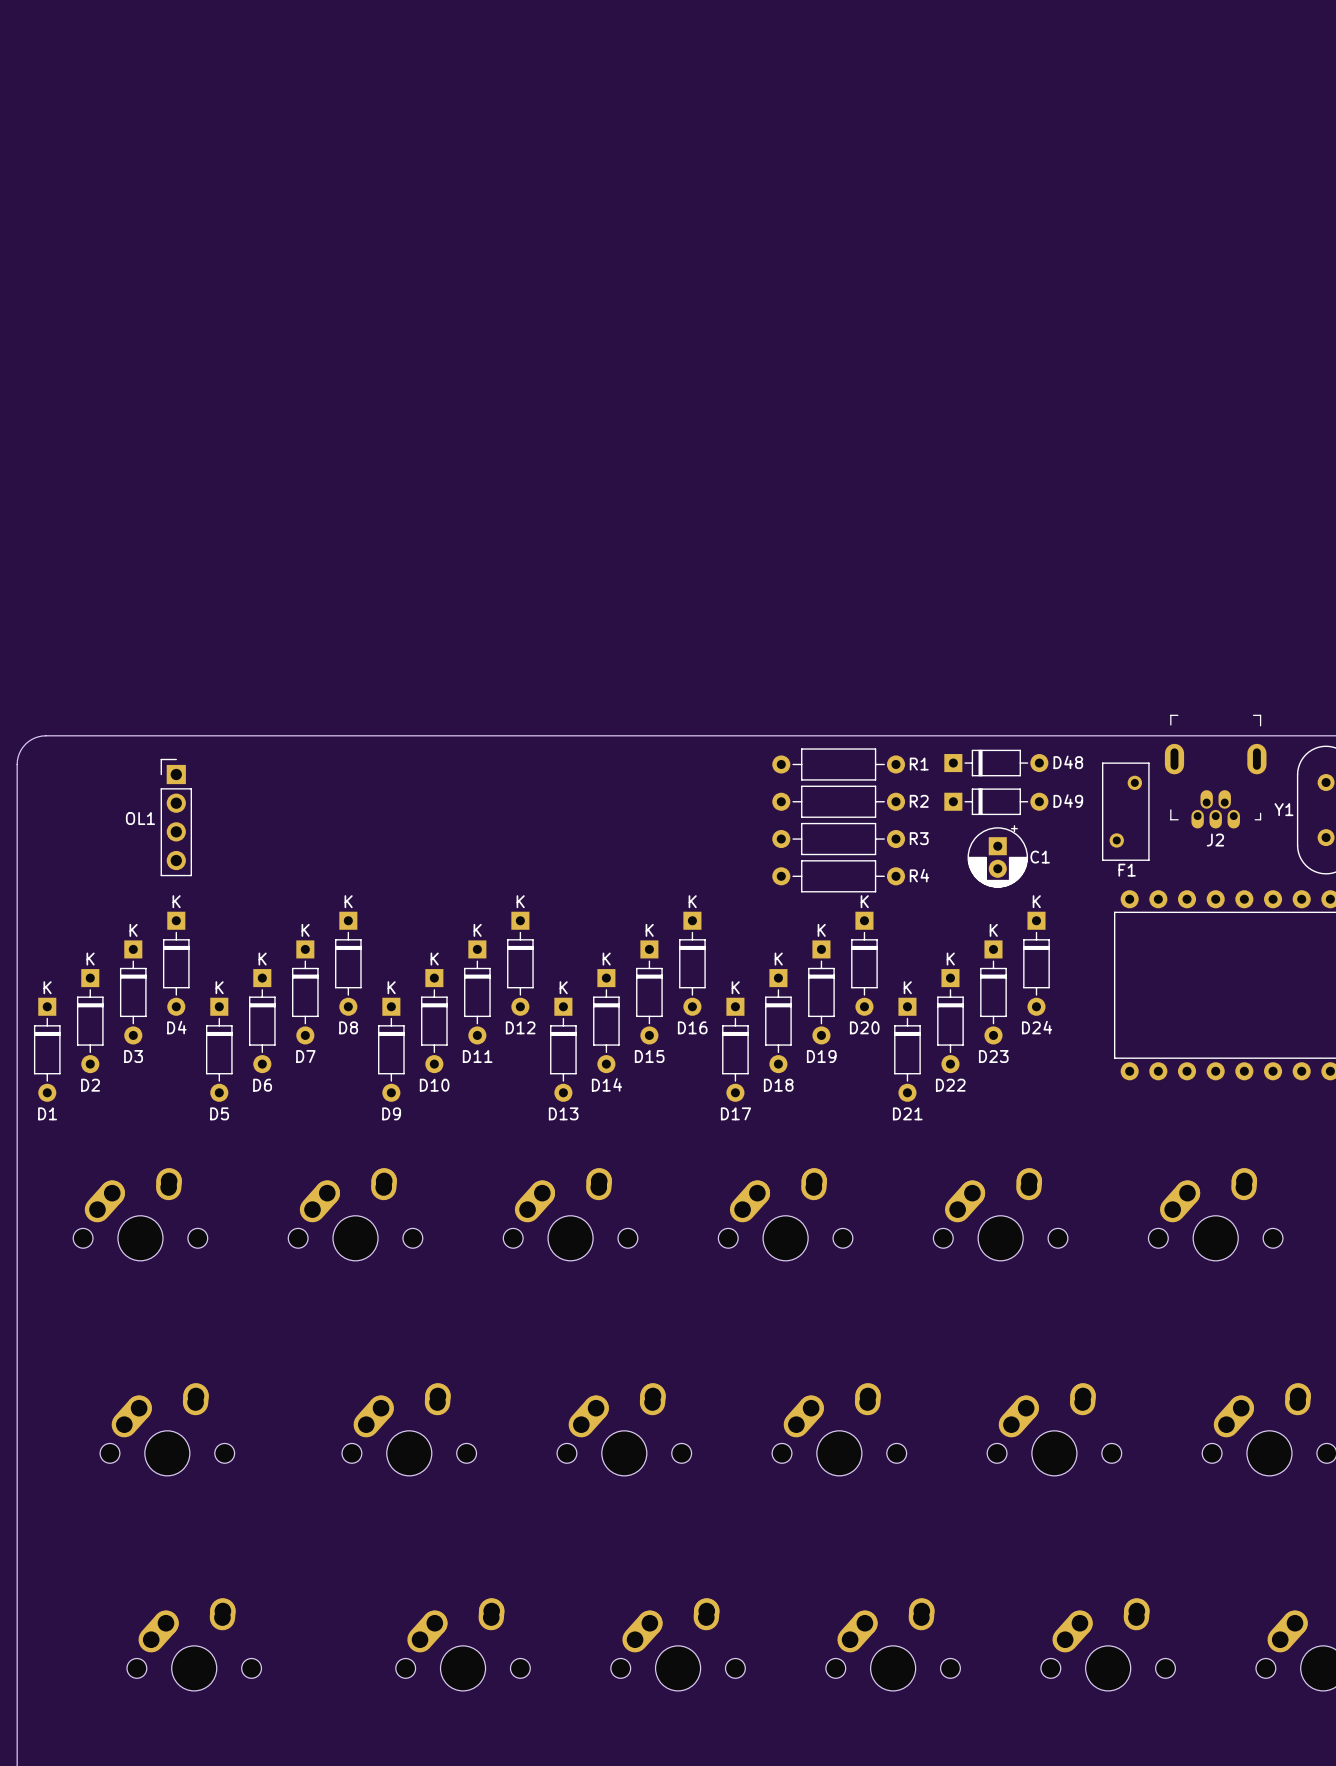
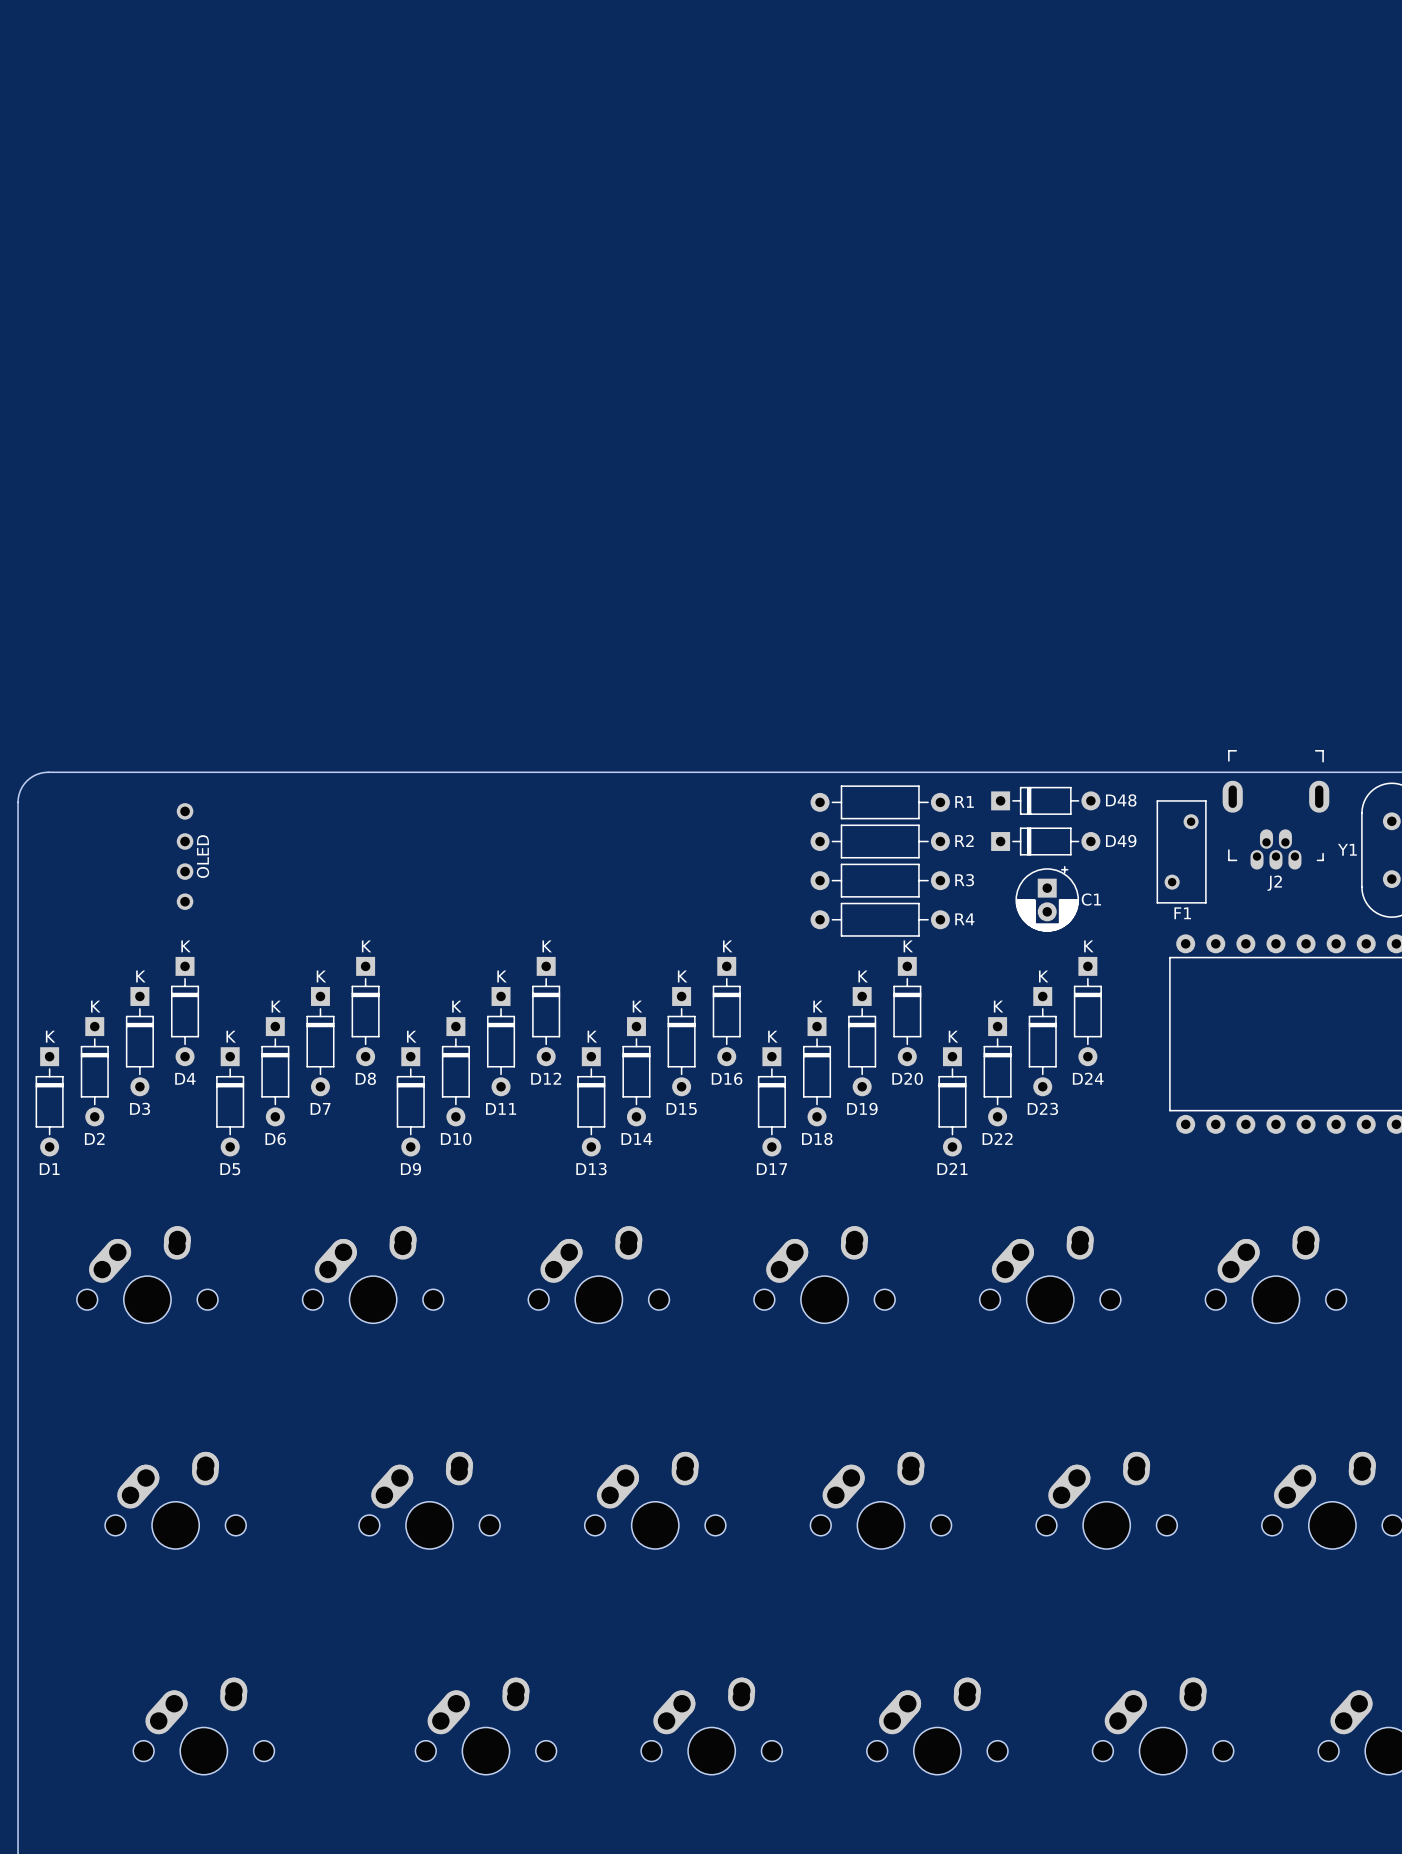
part: none -> (185, 856)
OL1: (176, 817) -> none

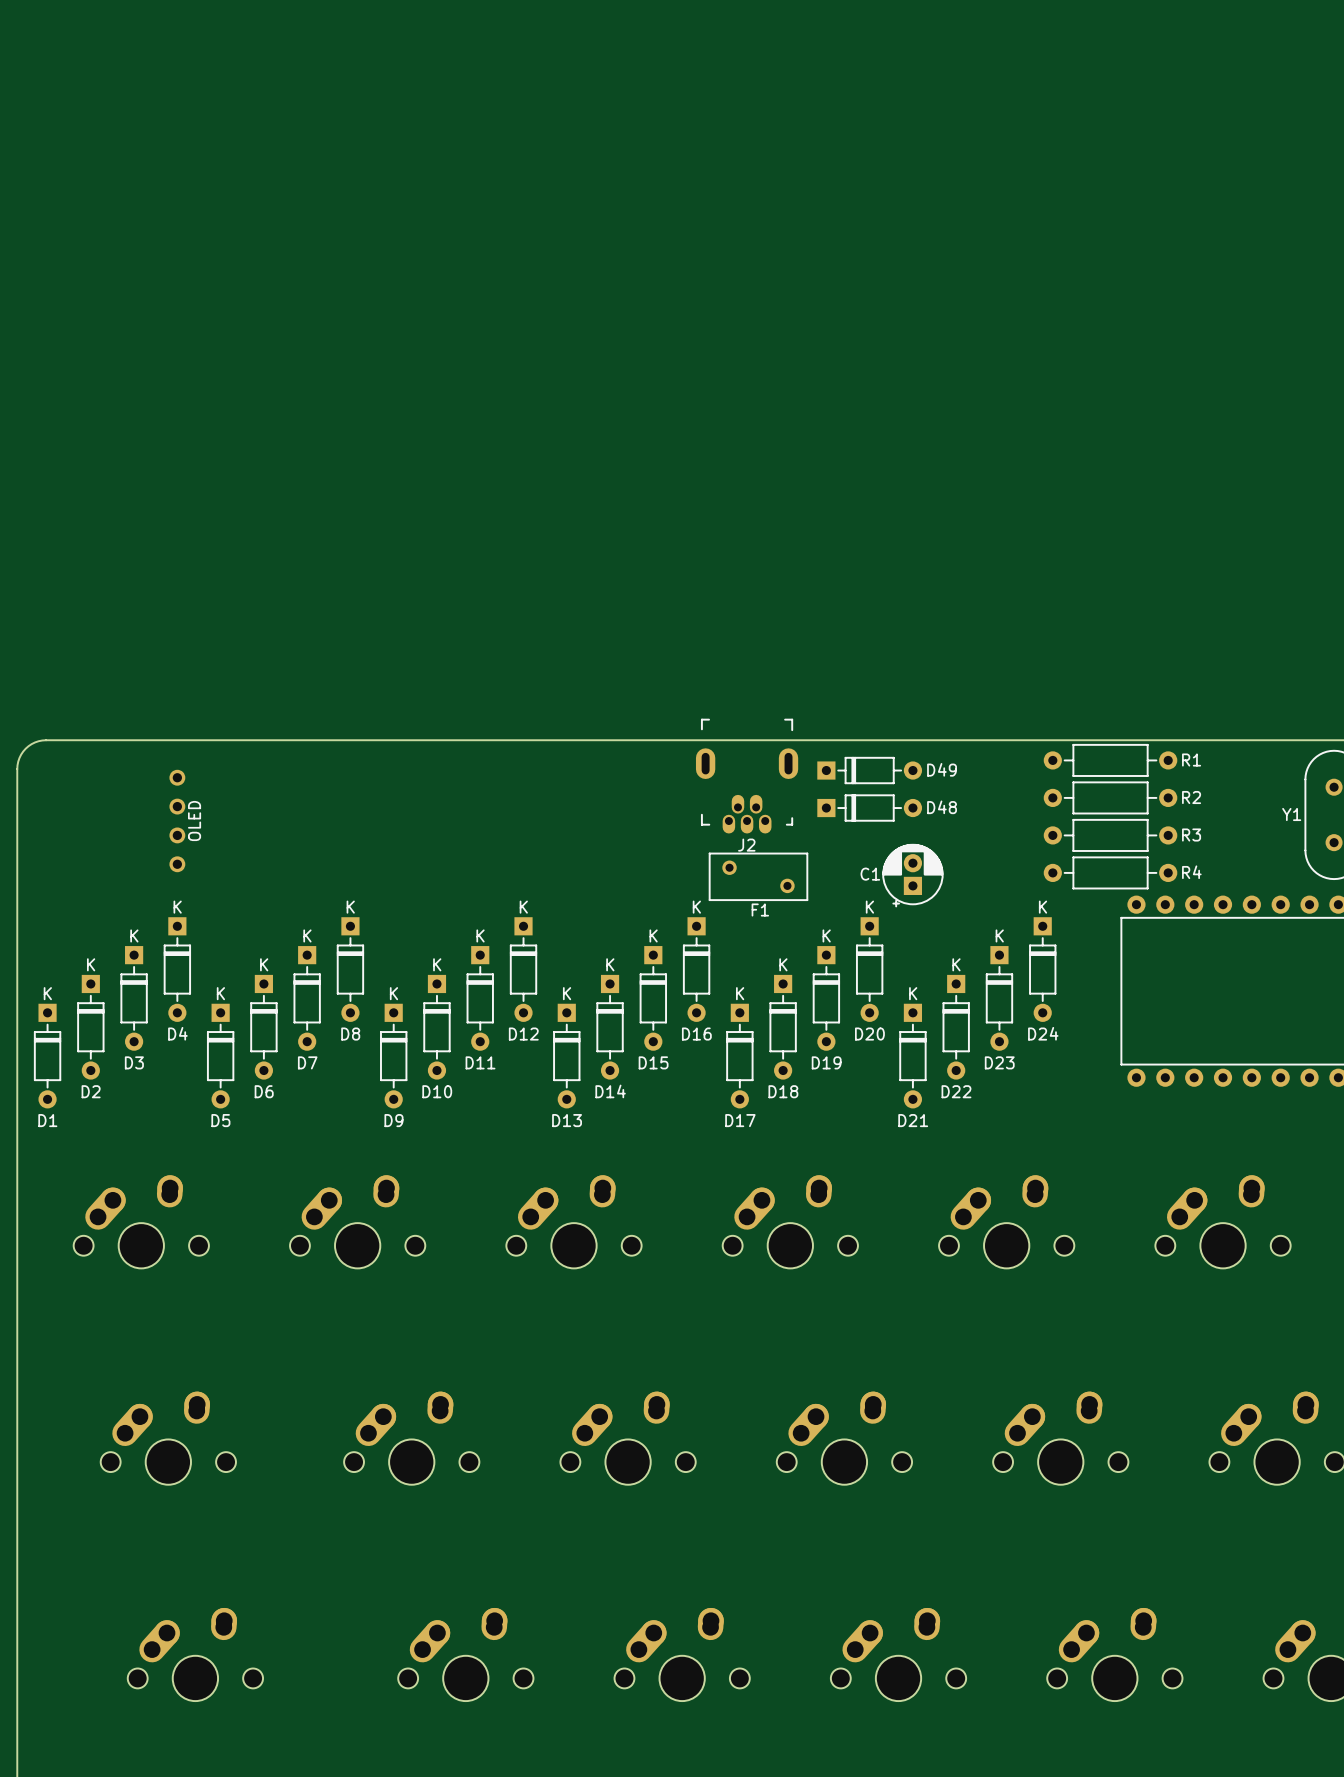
D48 position: (1045, 800) -> (869, 808)
R1 position: (880, 802) -> (1110, 760)
J2 position: (1275, 809) -> (747, 776)
R2 position: (880, 841) -> (1110, 797)
D49 position: (1045, 841) -> (869, 770)
F1 rotation: 0° (1181, 851) -> 90° clockwise (758, 876)
F1 position: (1181, 851) -> (758, 876)
R3 position: (880, 880) -> (1110, 835)
C1 rotation: 0° (1047, 898) -> 180° (912, 875)
C1 position: (1047, 898) -> (912, 875)
F1 name position: F1 (1182, 913) -> F1 (760, 910)
R4 position: (880, 919) -> (1110, 872)

